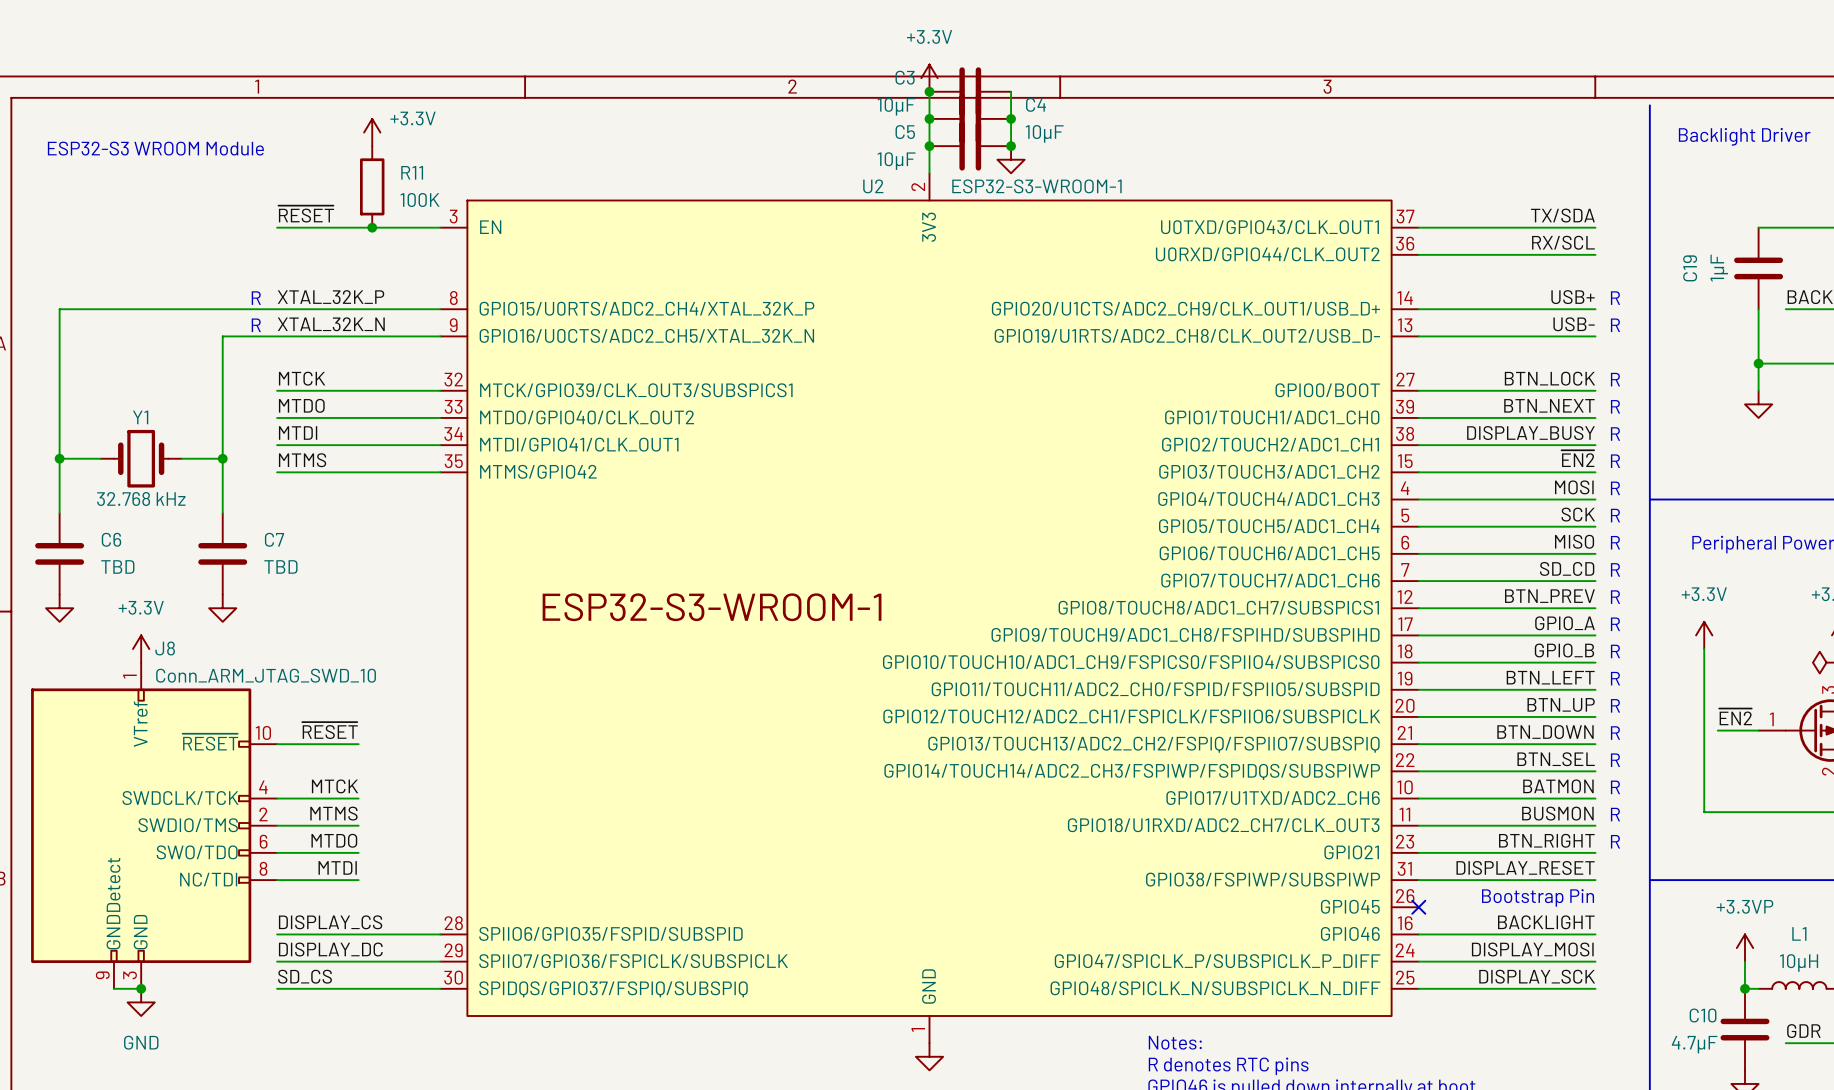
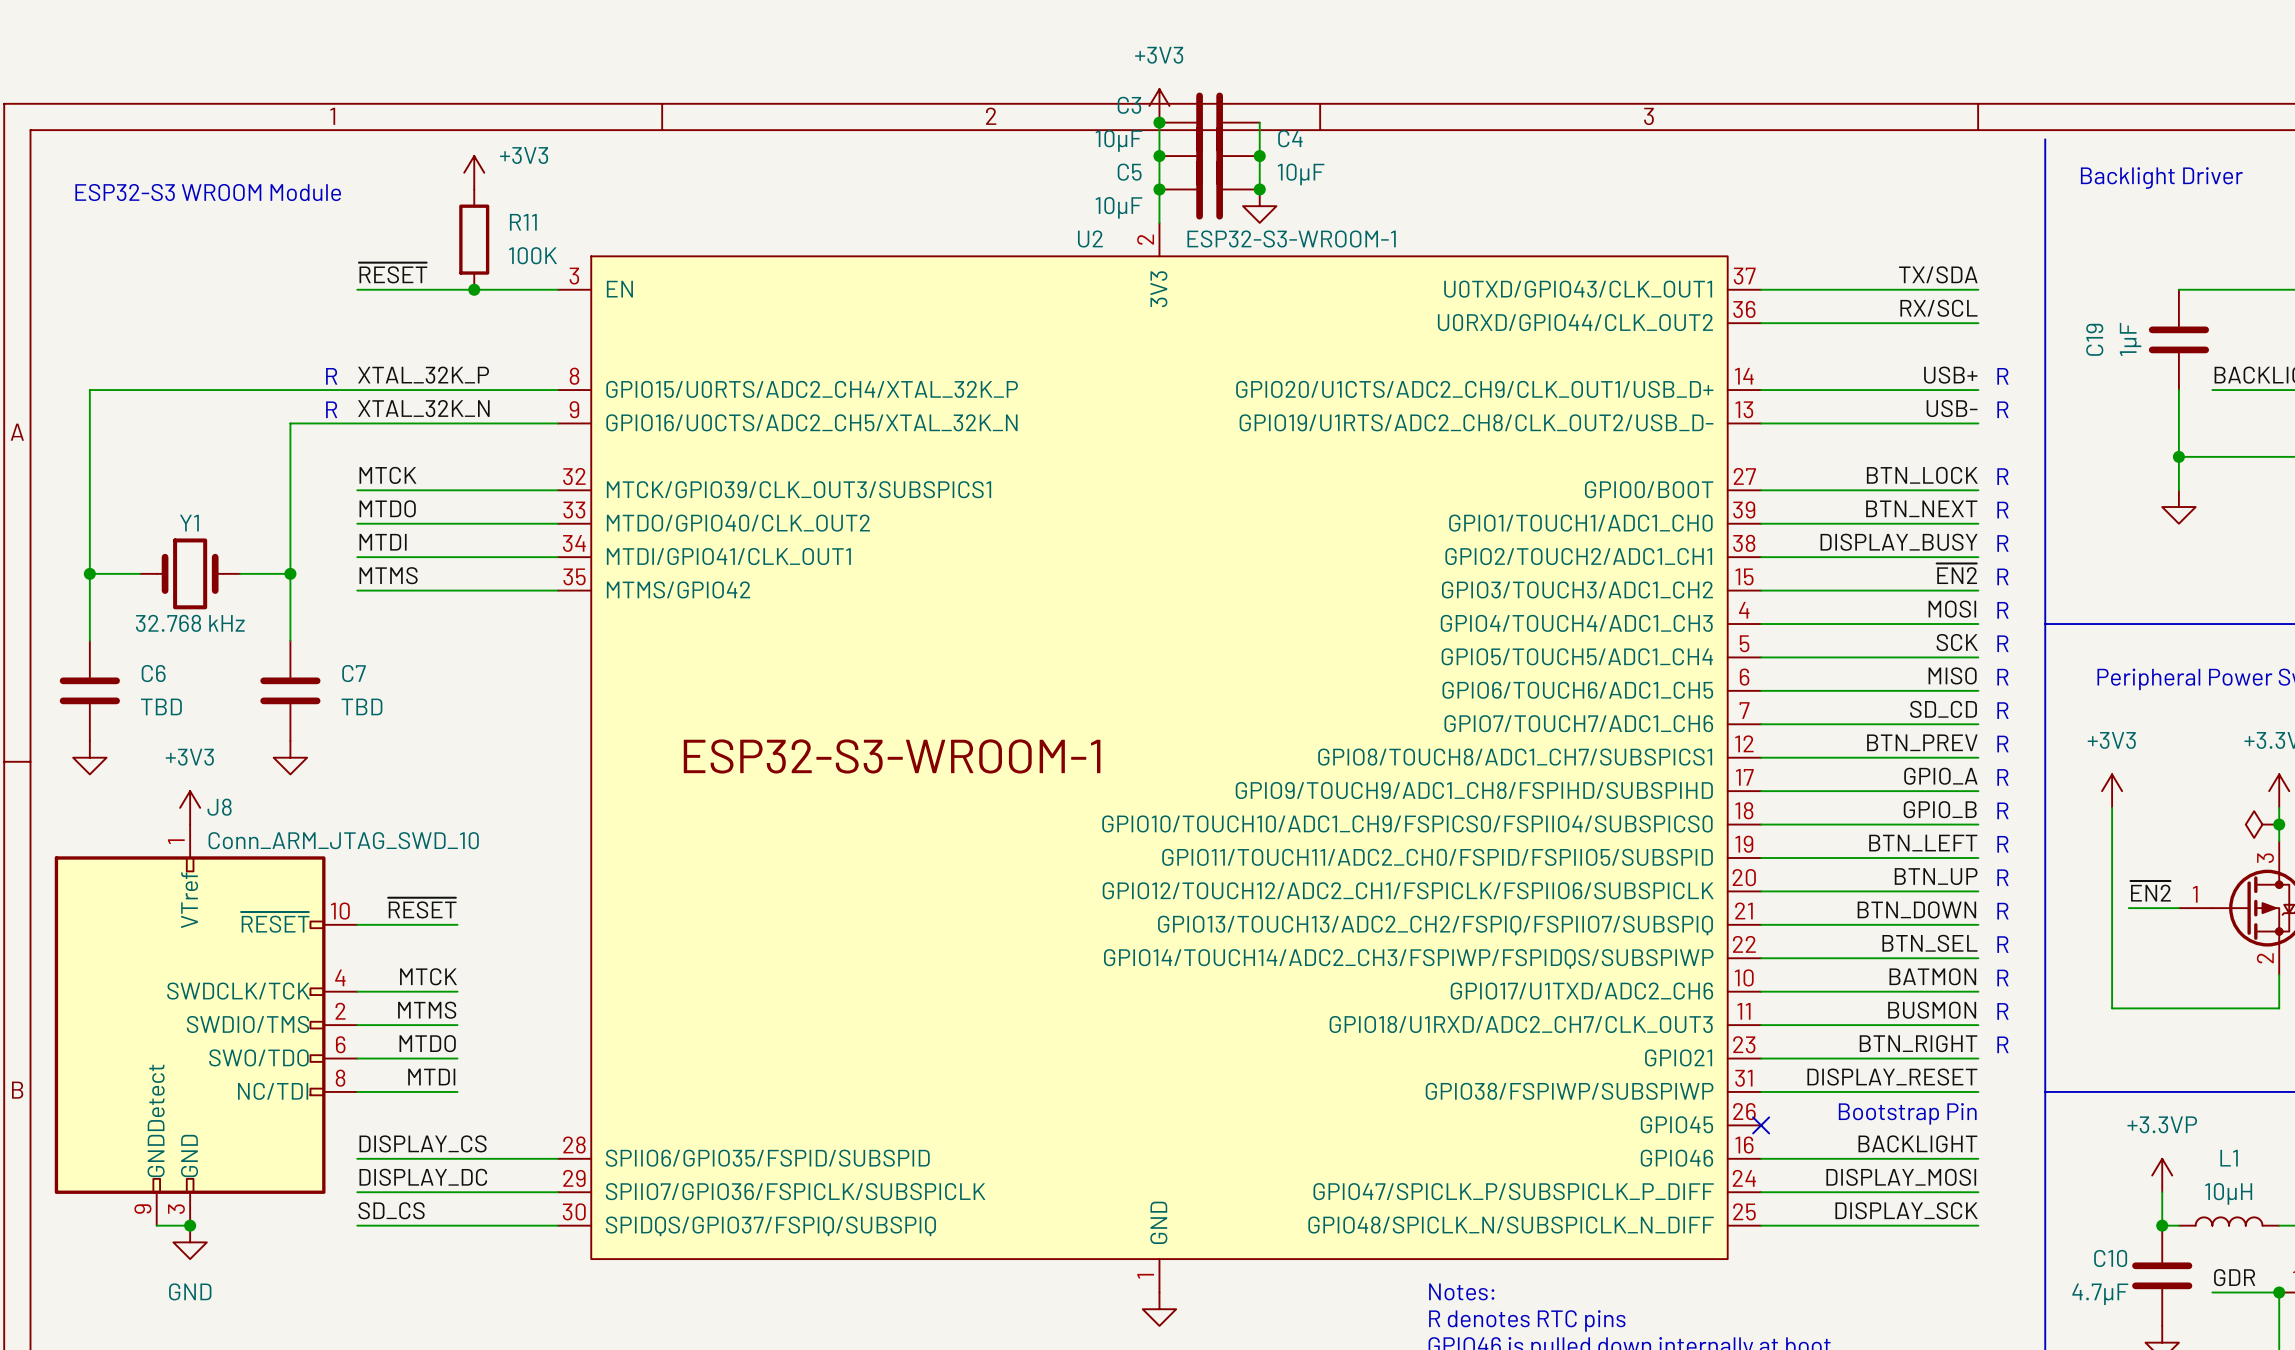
power symbol: +3.3V (929, 78) -> +3V3 (1159, 105)
power symbol: +3.3V (372, 132) -> +3V3 (474, 172)
power symbol: +3.3V (1704, 635) -> +3V3 (2112, 791)
power symbol: +3.3V (141, 649) -> +3V3 (190, 807)

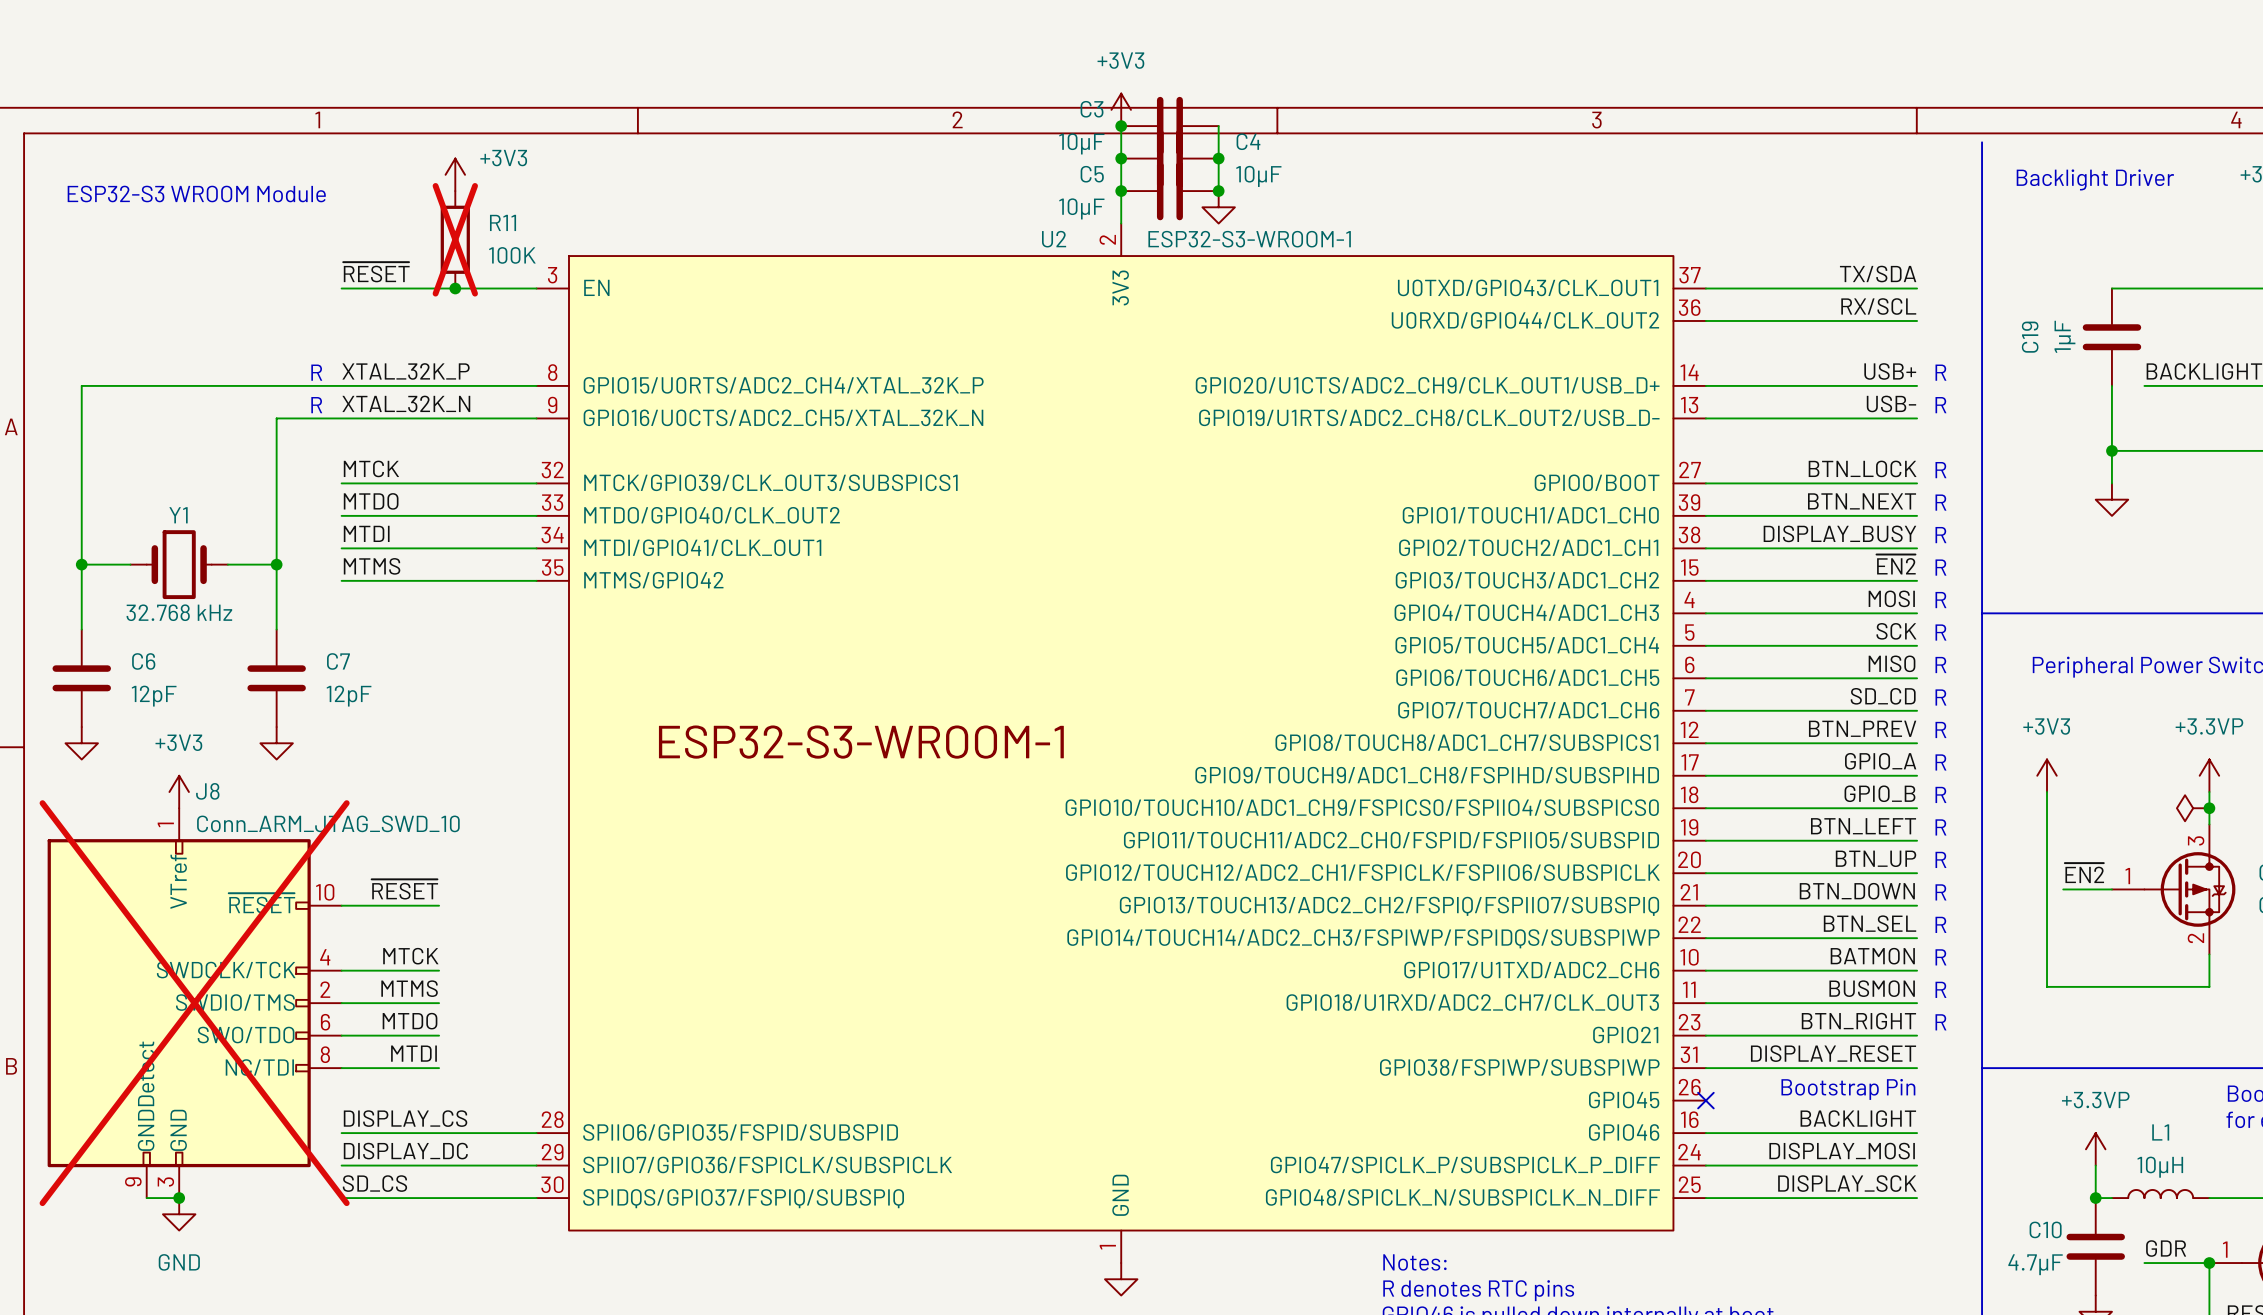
R11 do-not-place cross: none -> (455, 239)
C6 value: TBD (161, 706) -> 12pF (154, 696)
C7 value: TBD (361, 706) -> 12pF (349, 696)
J8 do-not-place cross: none -> (194, 1003)

